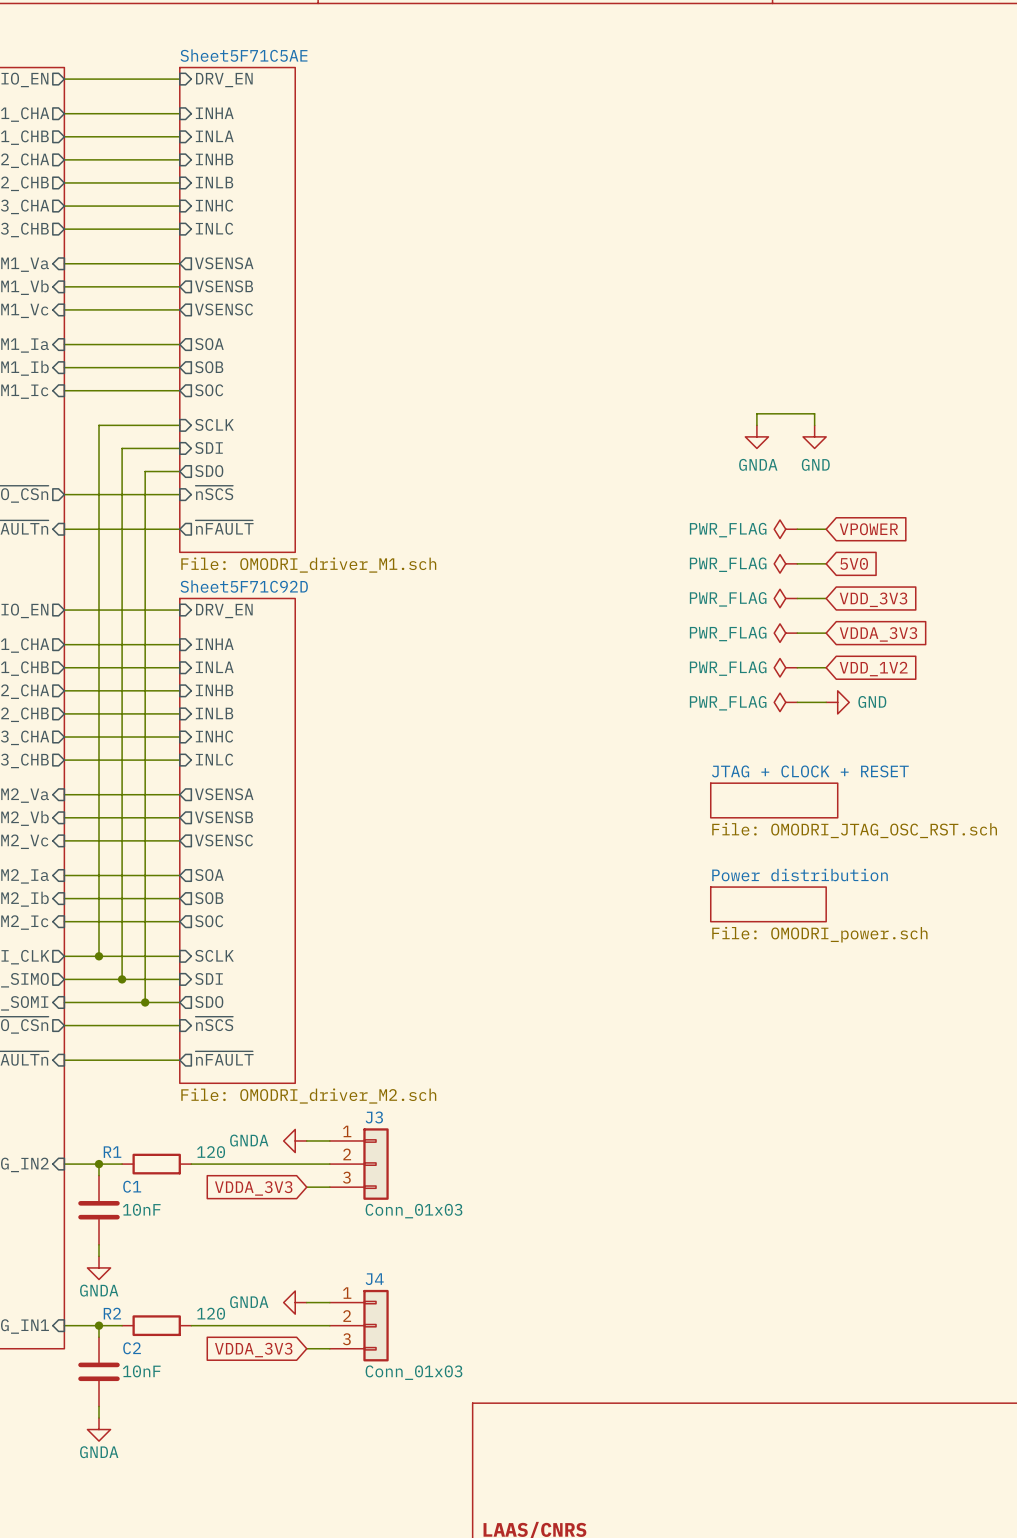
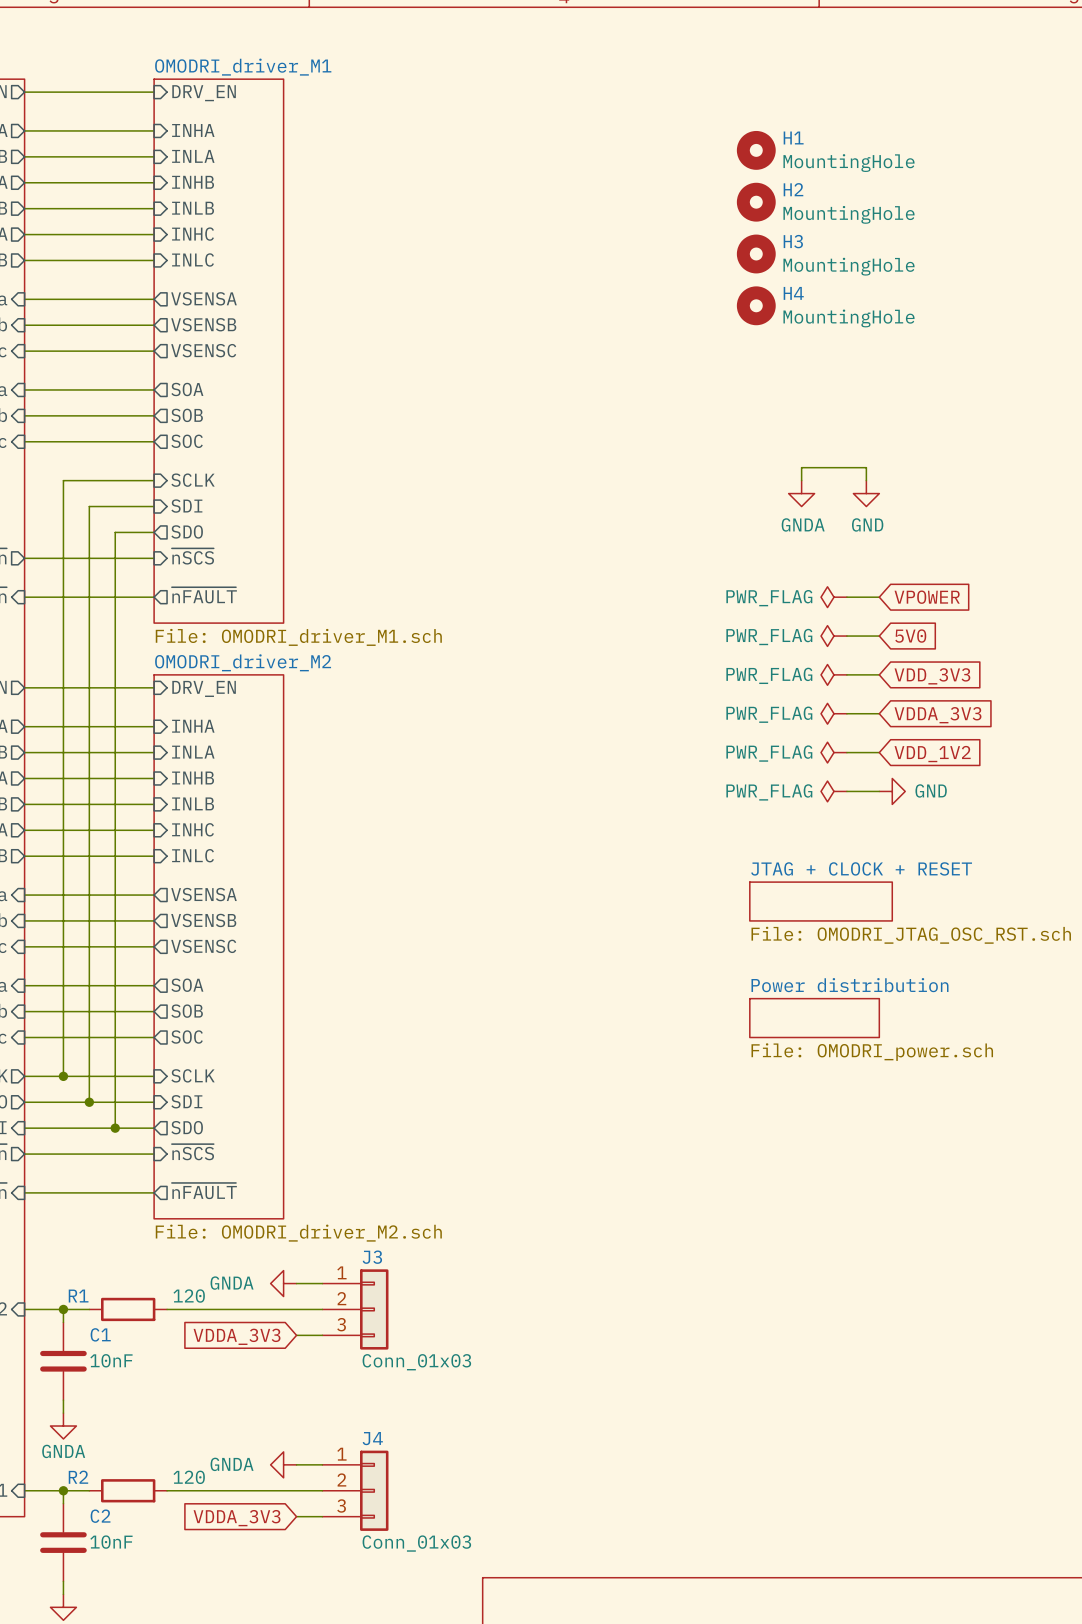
sheet Sheet5F71C5AE name: Sheet5F71C5AE (244, 55) -> OMODRI_driver_M1 (243, 67)
H1: none -> MountingHole (756, 150)
H2: none -> MountingHole (756, 202)
H3: none -> MountingHole (756, 254)
H4: none -> MountingHole (756, 305)
sheet Sheet5F71C92D name: Sheet5F71C92D (244, 586) -> OMODRI_driver_M2 (243, 662)

